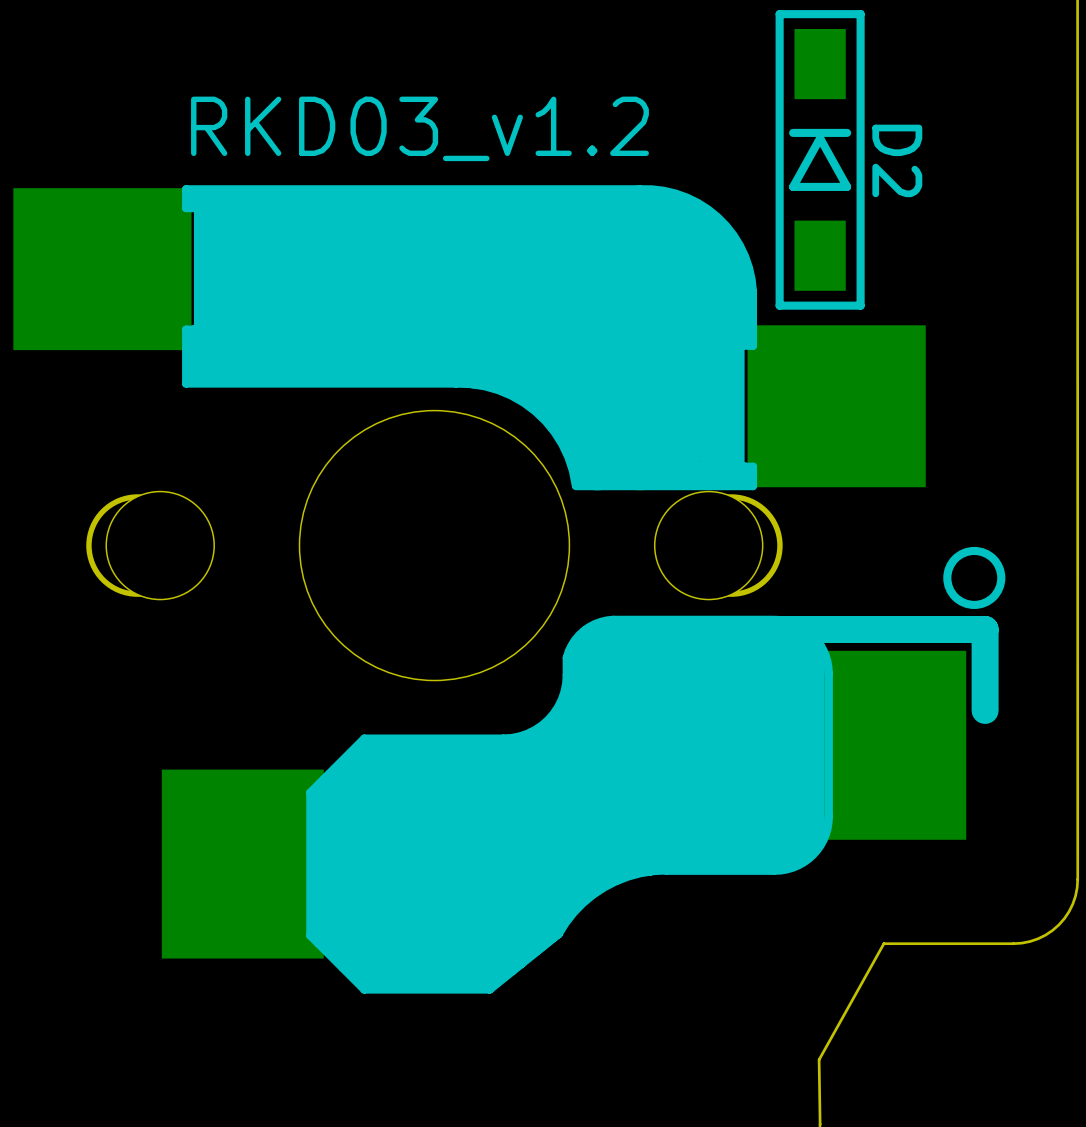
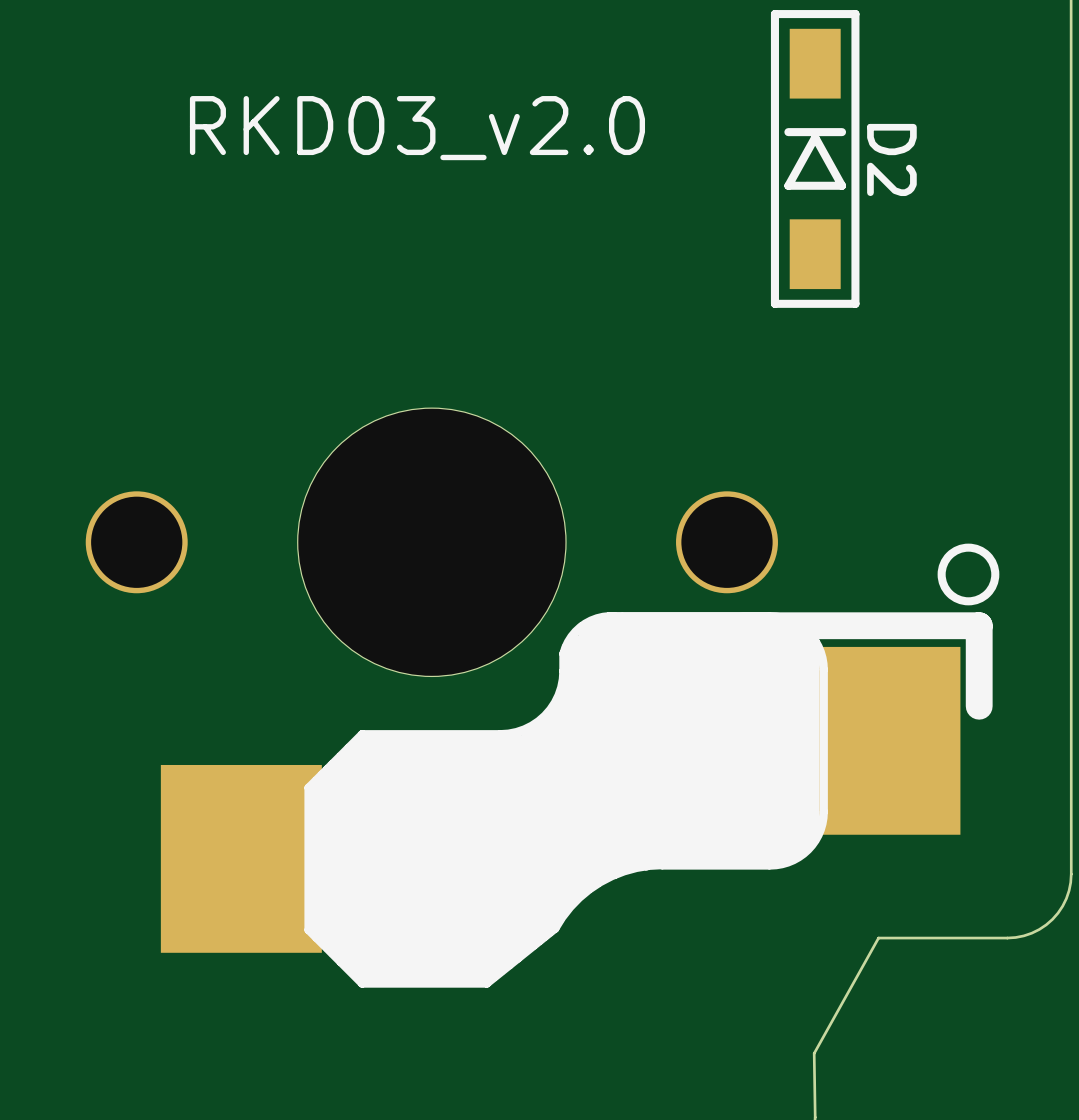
text: RKD03_v1.2 (419, 128) -> RKD03_v2.0 (417, 128)
part: (509, 589) -> none
part: none -> (542, 697)

